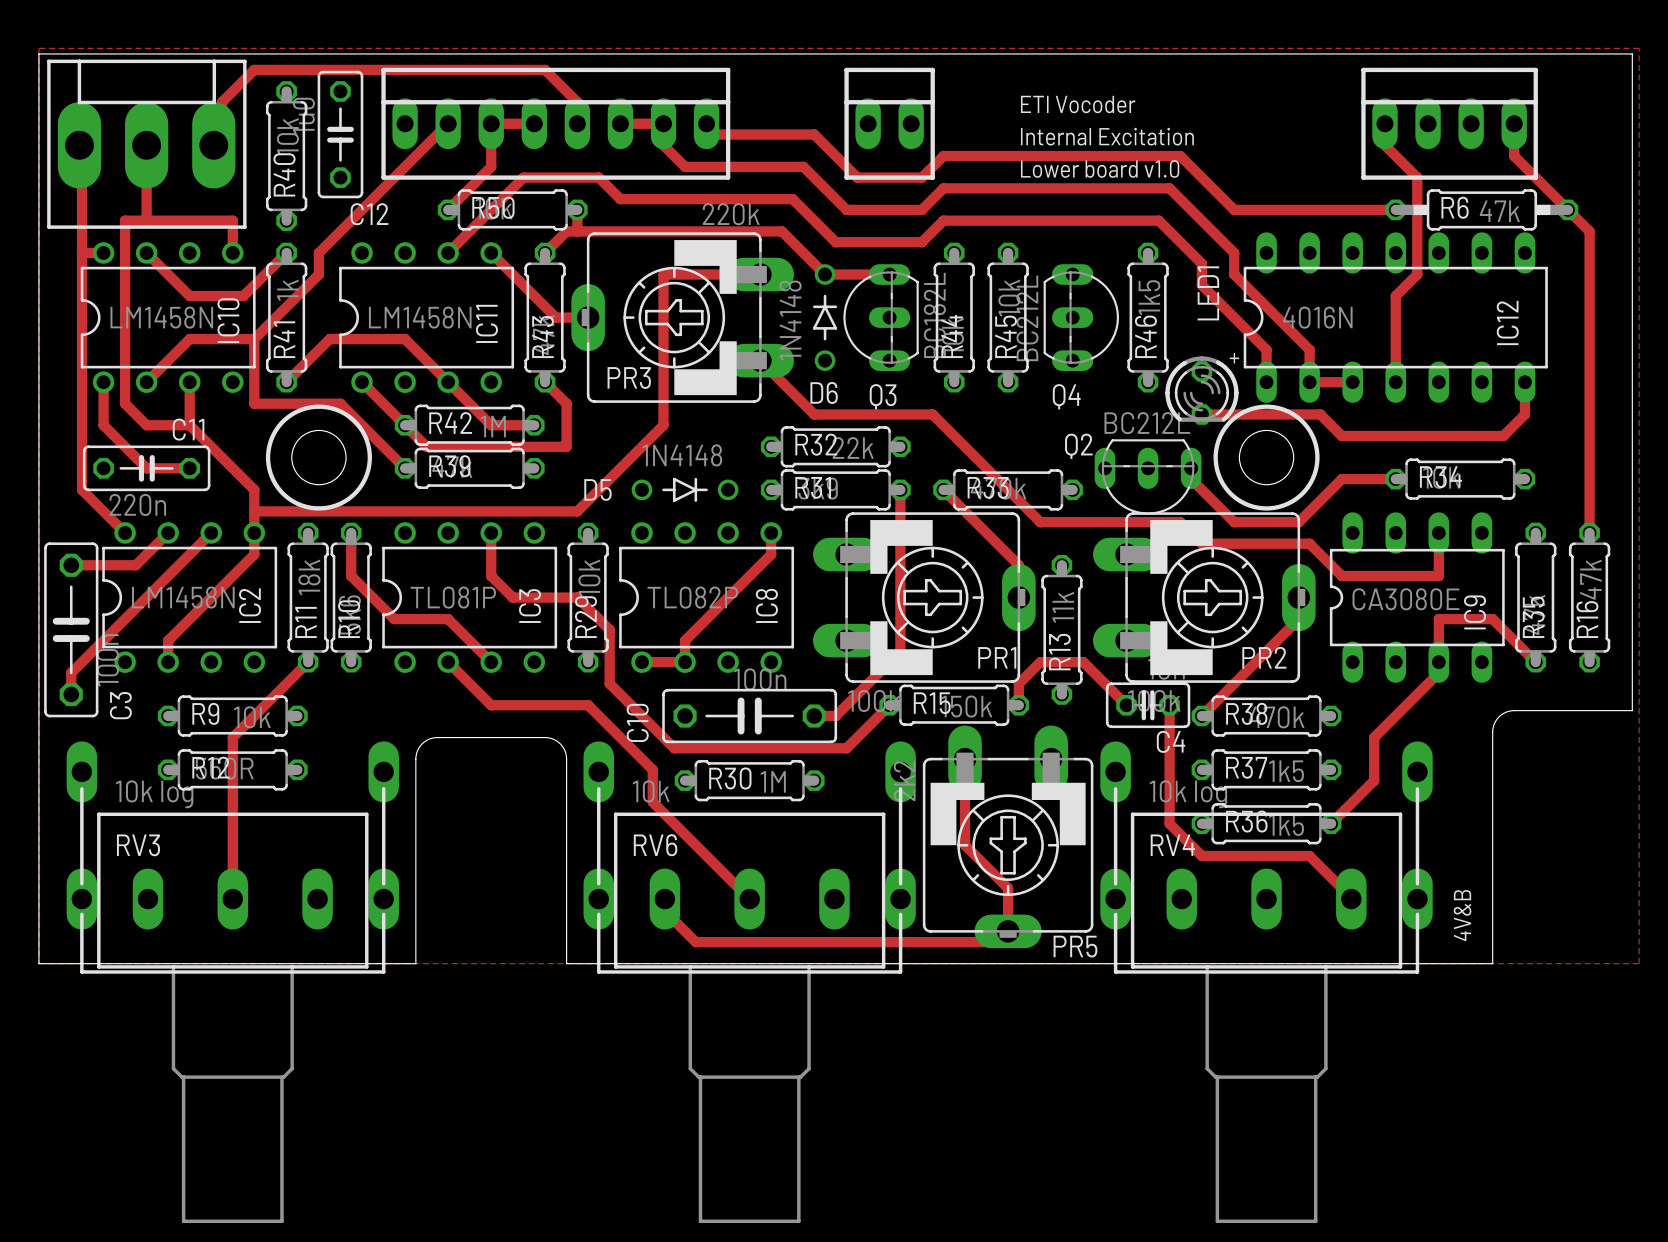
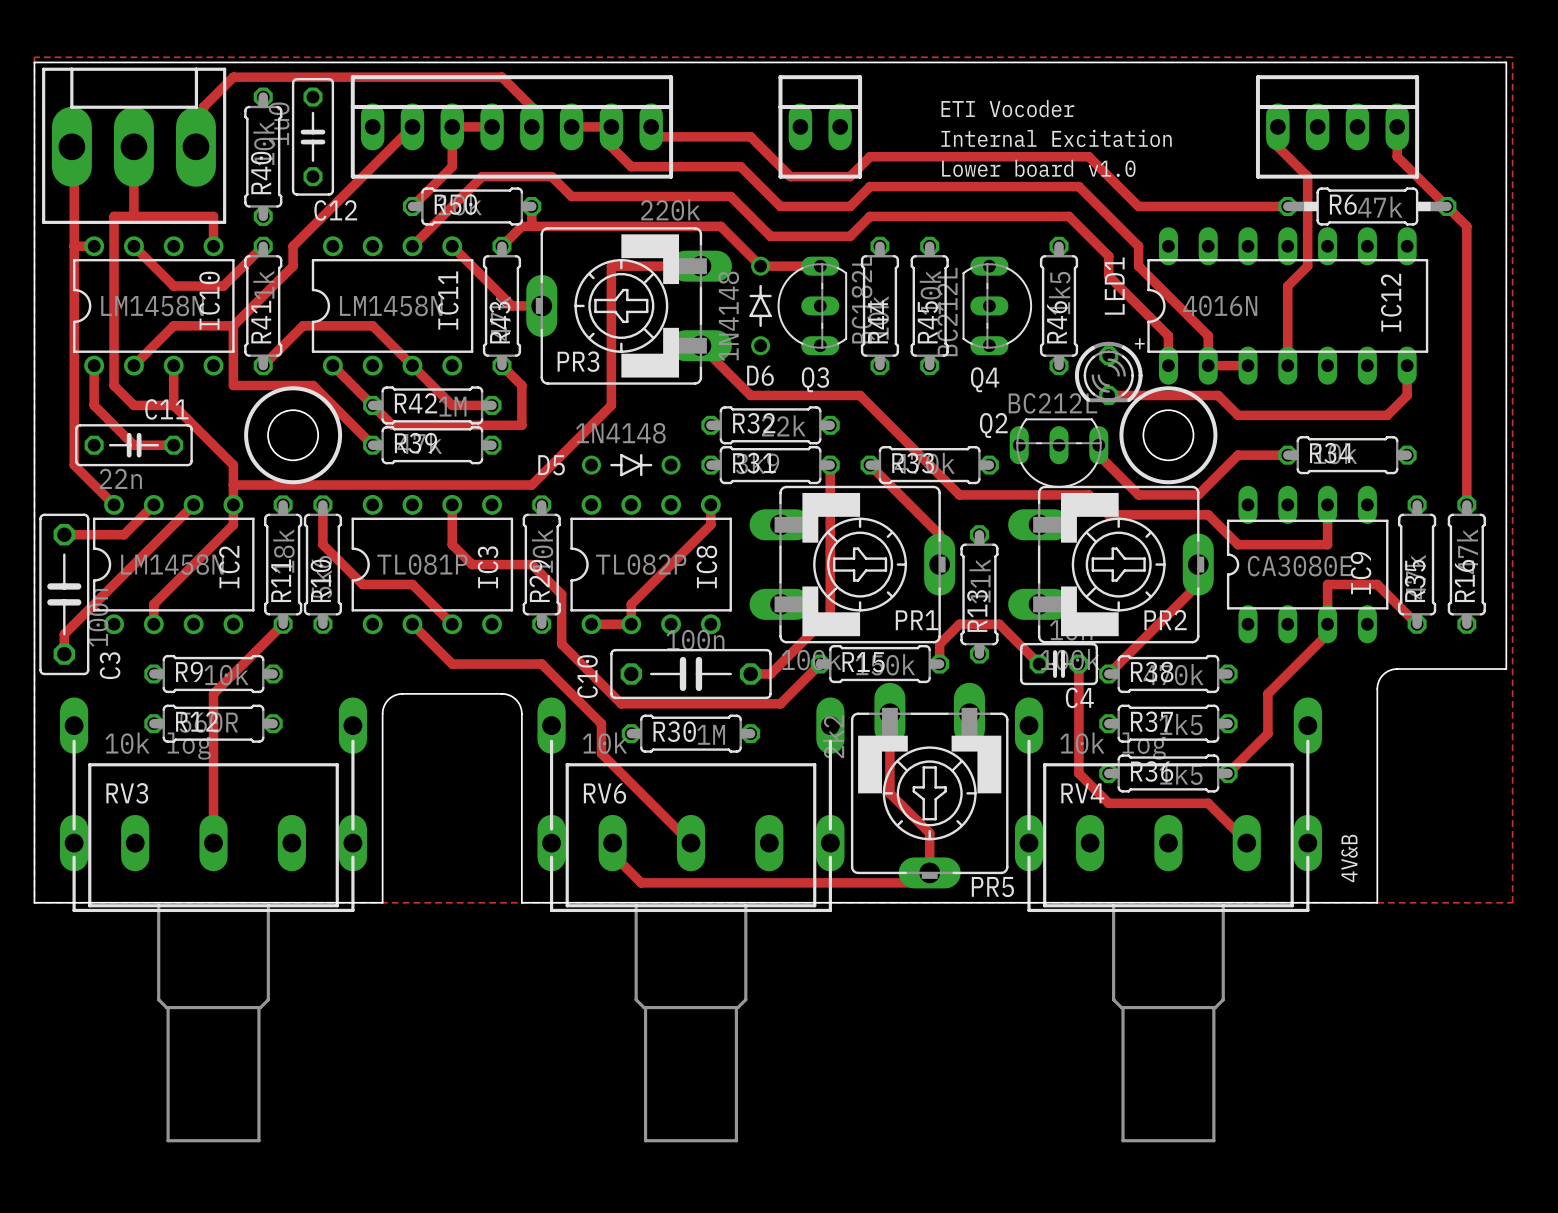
C11 value: 220n (137, 504) -> 22n (120, 478)

